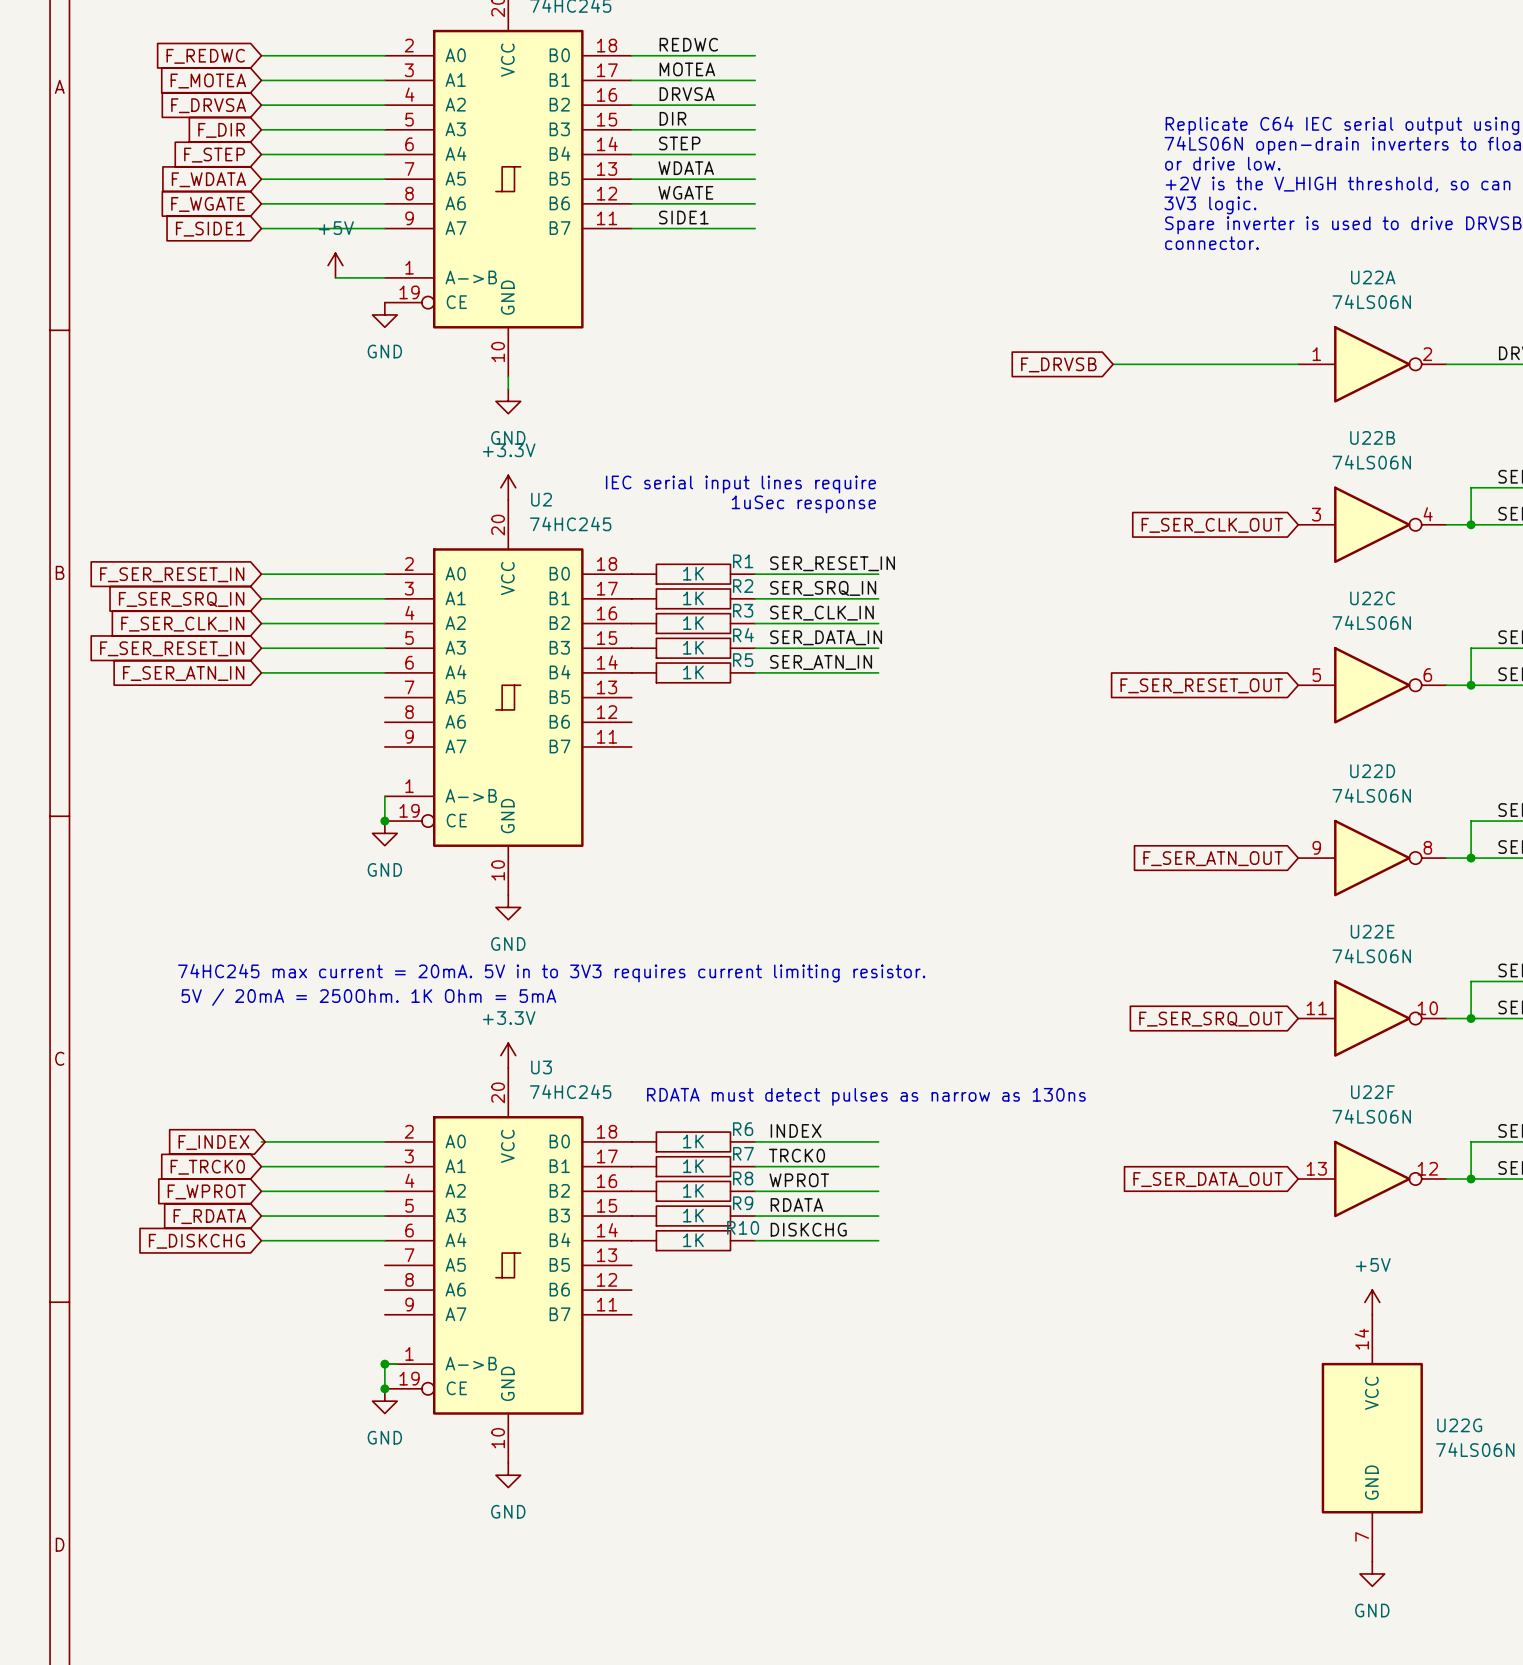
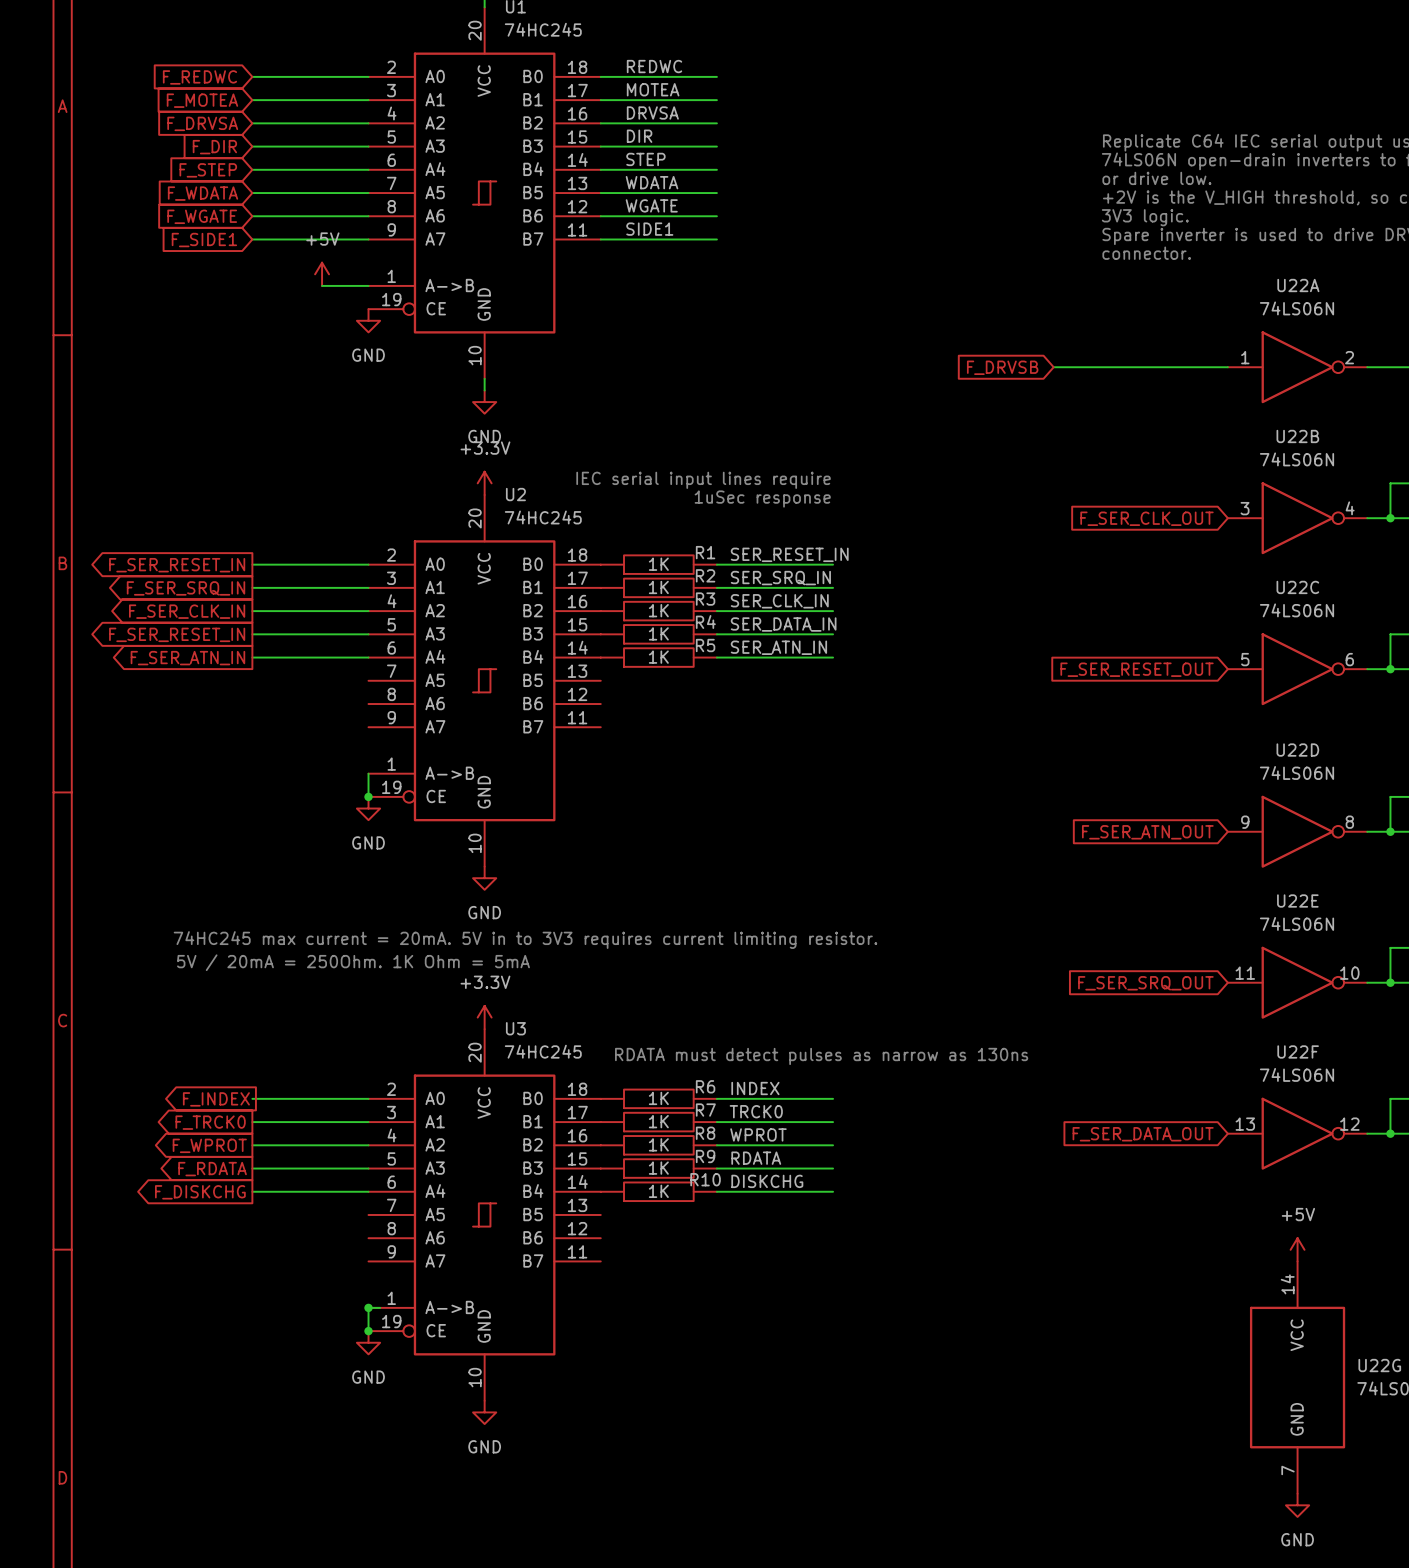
global label shape: input (172, 574) -> output (177, 565)
global label shape: input (181, 599) -> output (186, 588)
global label shape: input (182, 624) -> output (187, 611)
global label shape: input (172, 648) -> output (177, 634)
global label shape: input (183, 673) -> output (187, 658)
global label shape: input (213, 1142) -> output (216, 1099)
global label shape: input (207, 1167) -> output (210, 1122)
global label shape: input (206, 1191) -> output (209, 1145)
global label shape: input (209, 1216) -> output (212, 1169)
global label shape: input (196, 1241) -> output (200, 1192)

